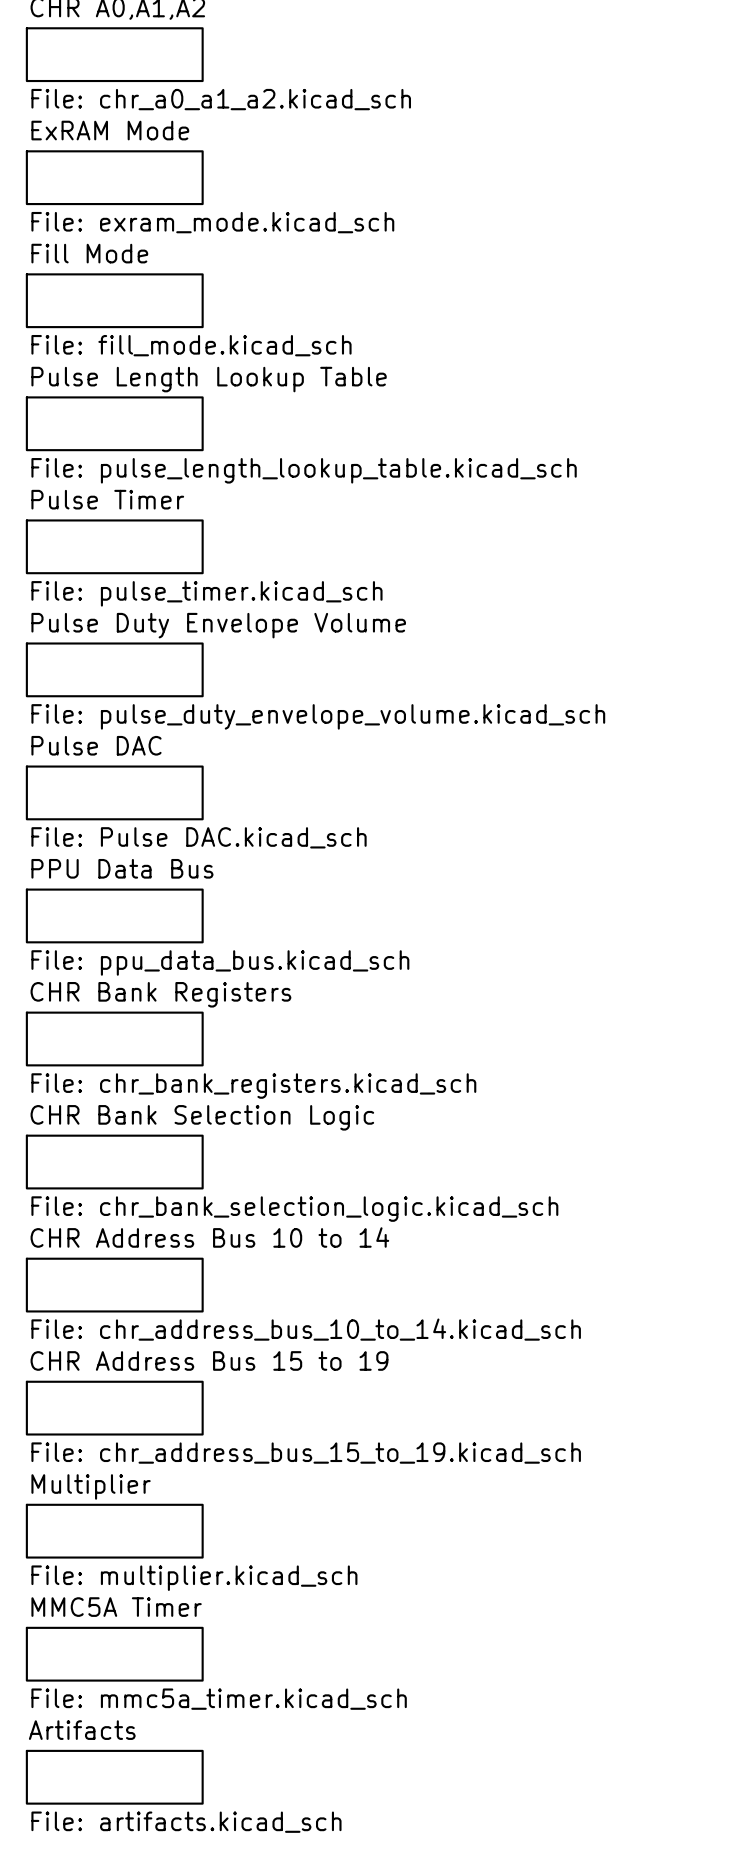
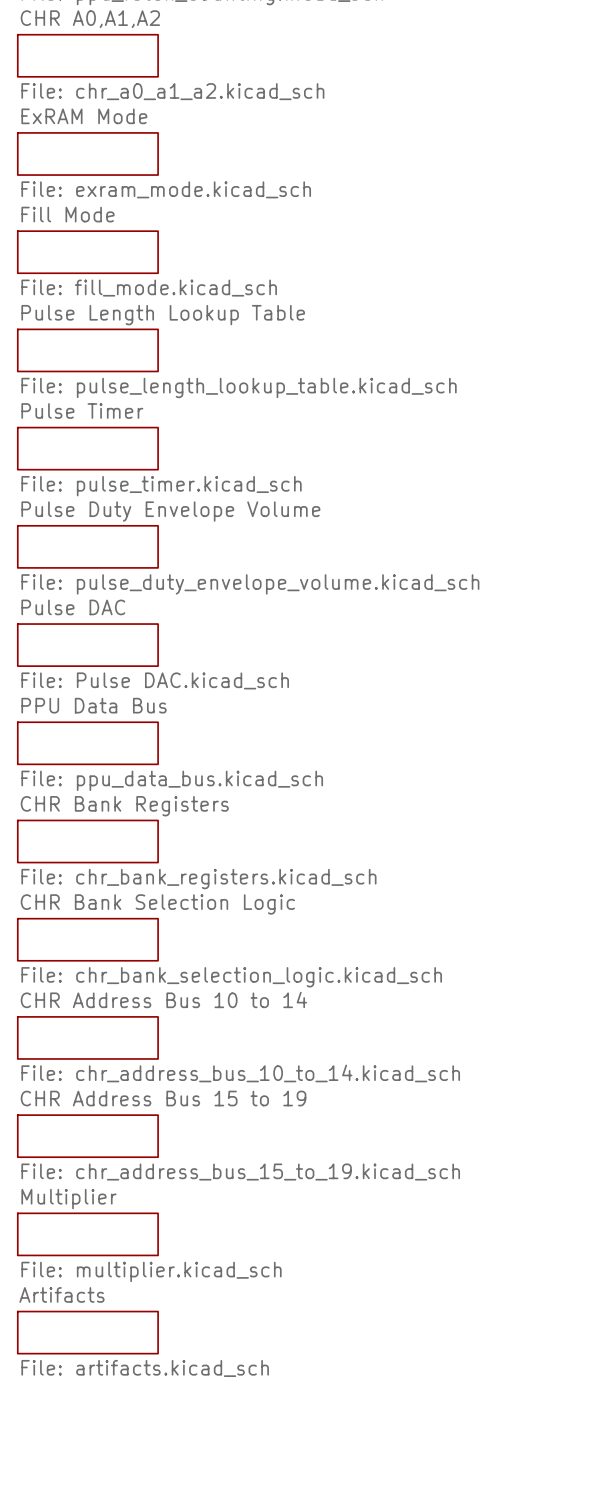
sheet MMC5A Timer name: MMC5A Timer (116, 1607) -> Artifacts (61, 1294)
sheet MMC5A Timer value: File: mmc5a_timer.kicad_sch (219, 1699) -> File: artifacts.kicad_sch (145, 1368)
sheet Artifacts: File: artifacts.kicad_sch (114, 1777) -> none

